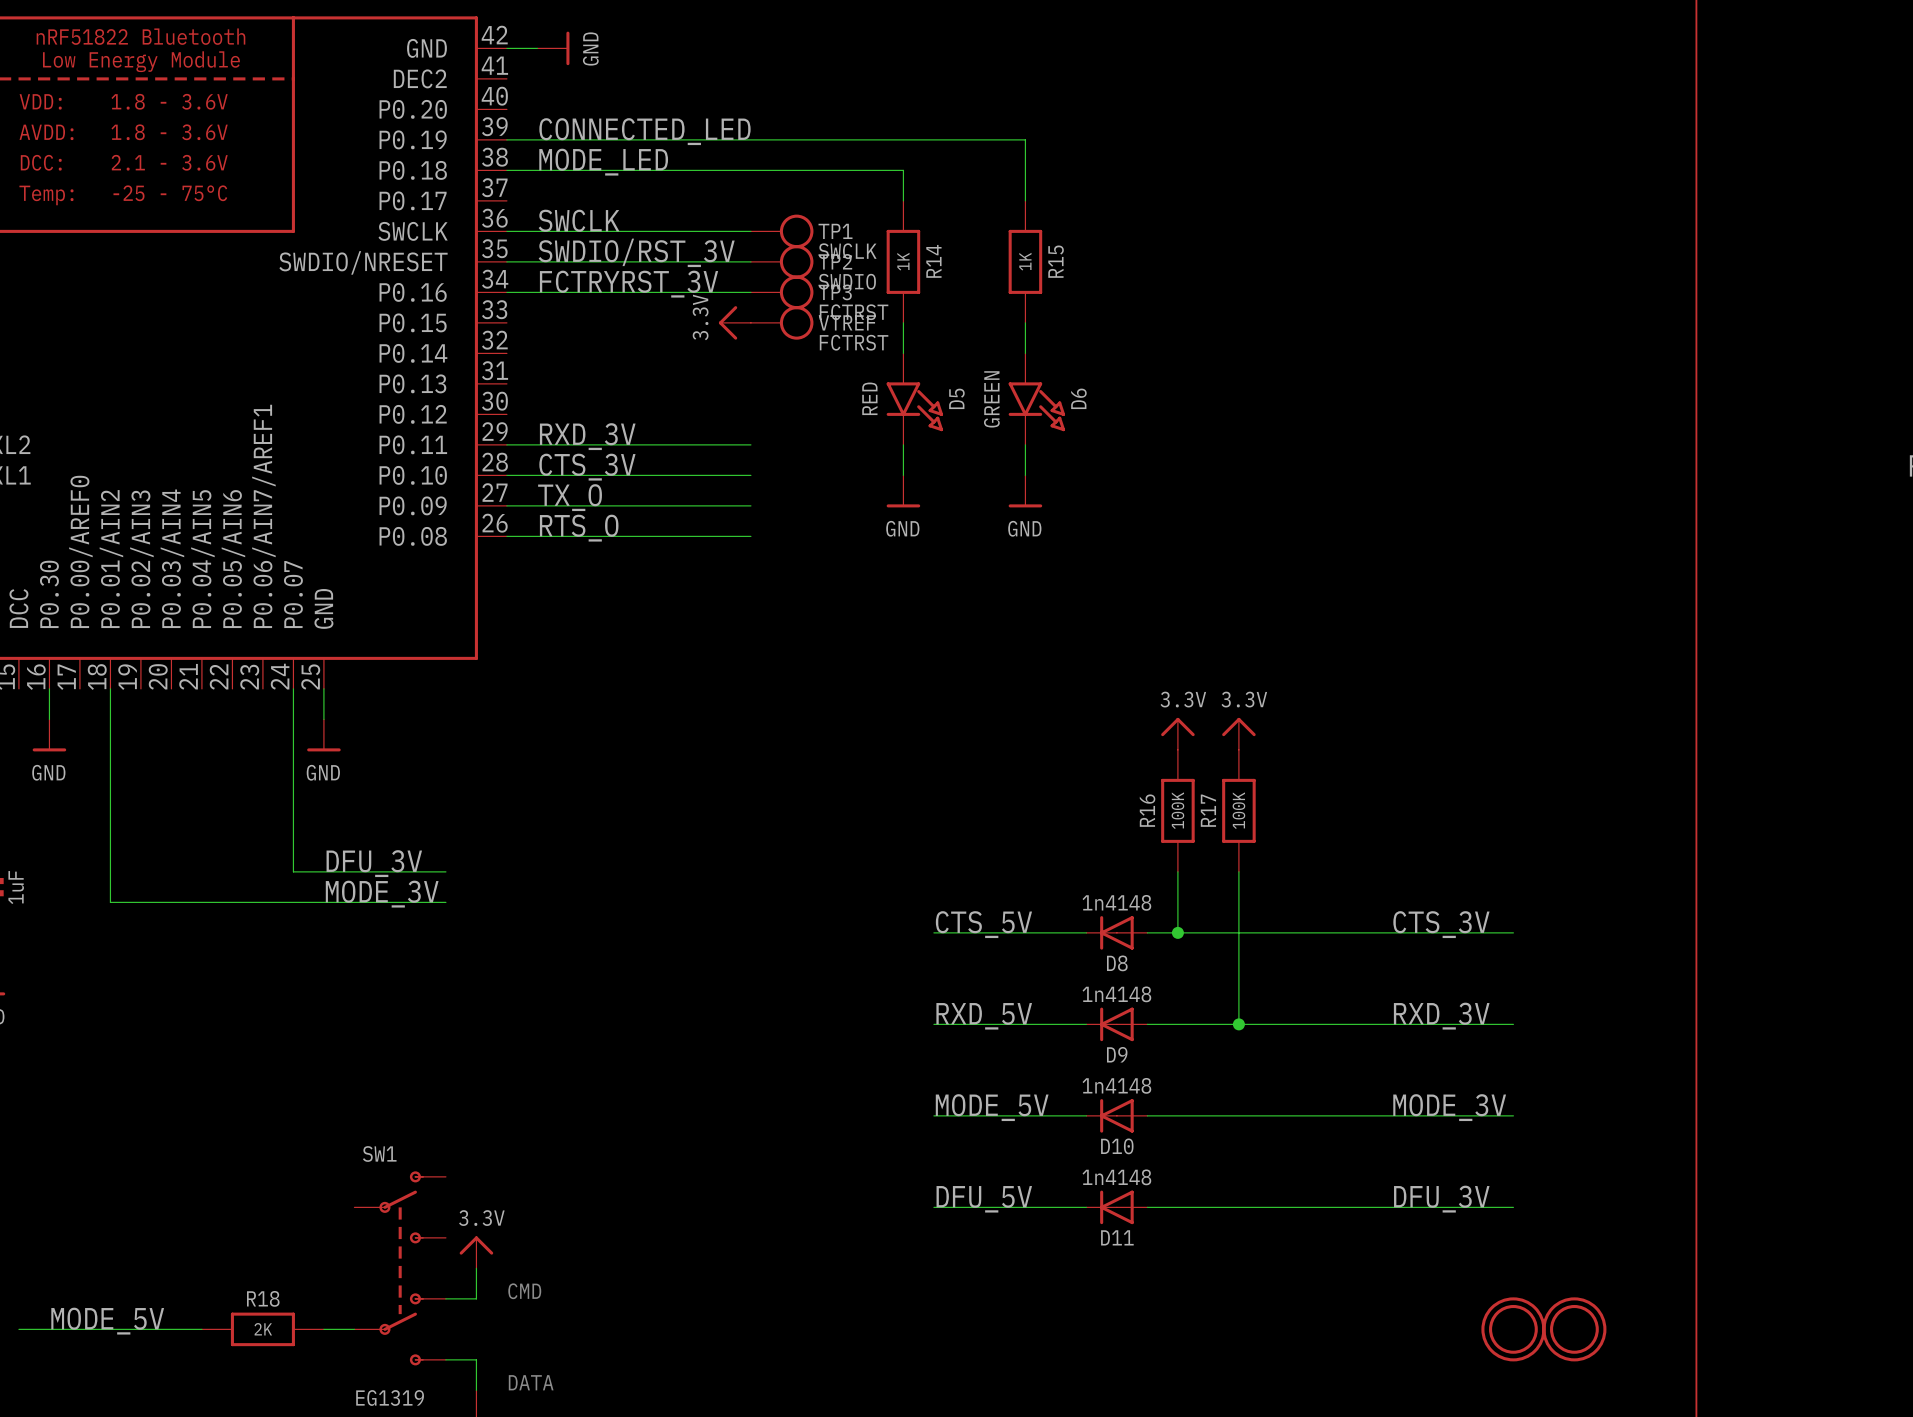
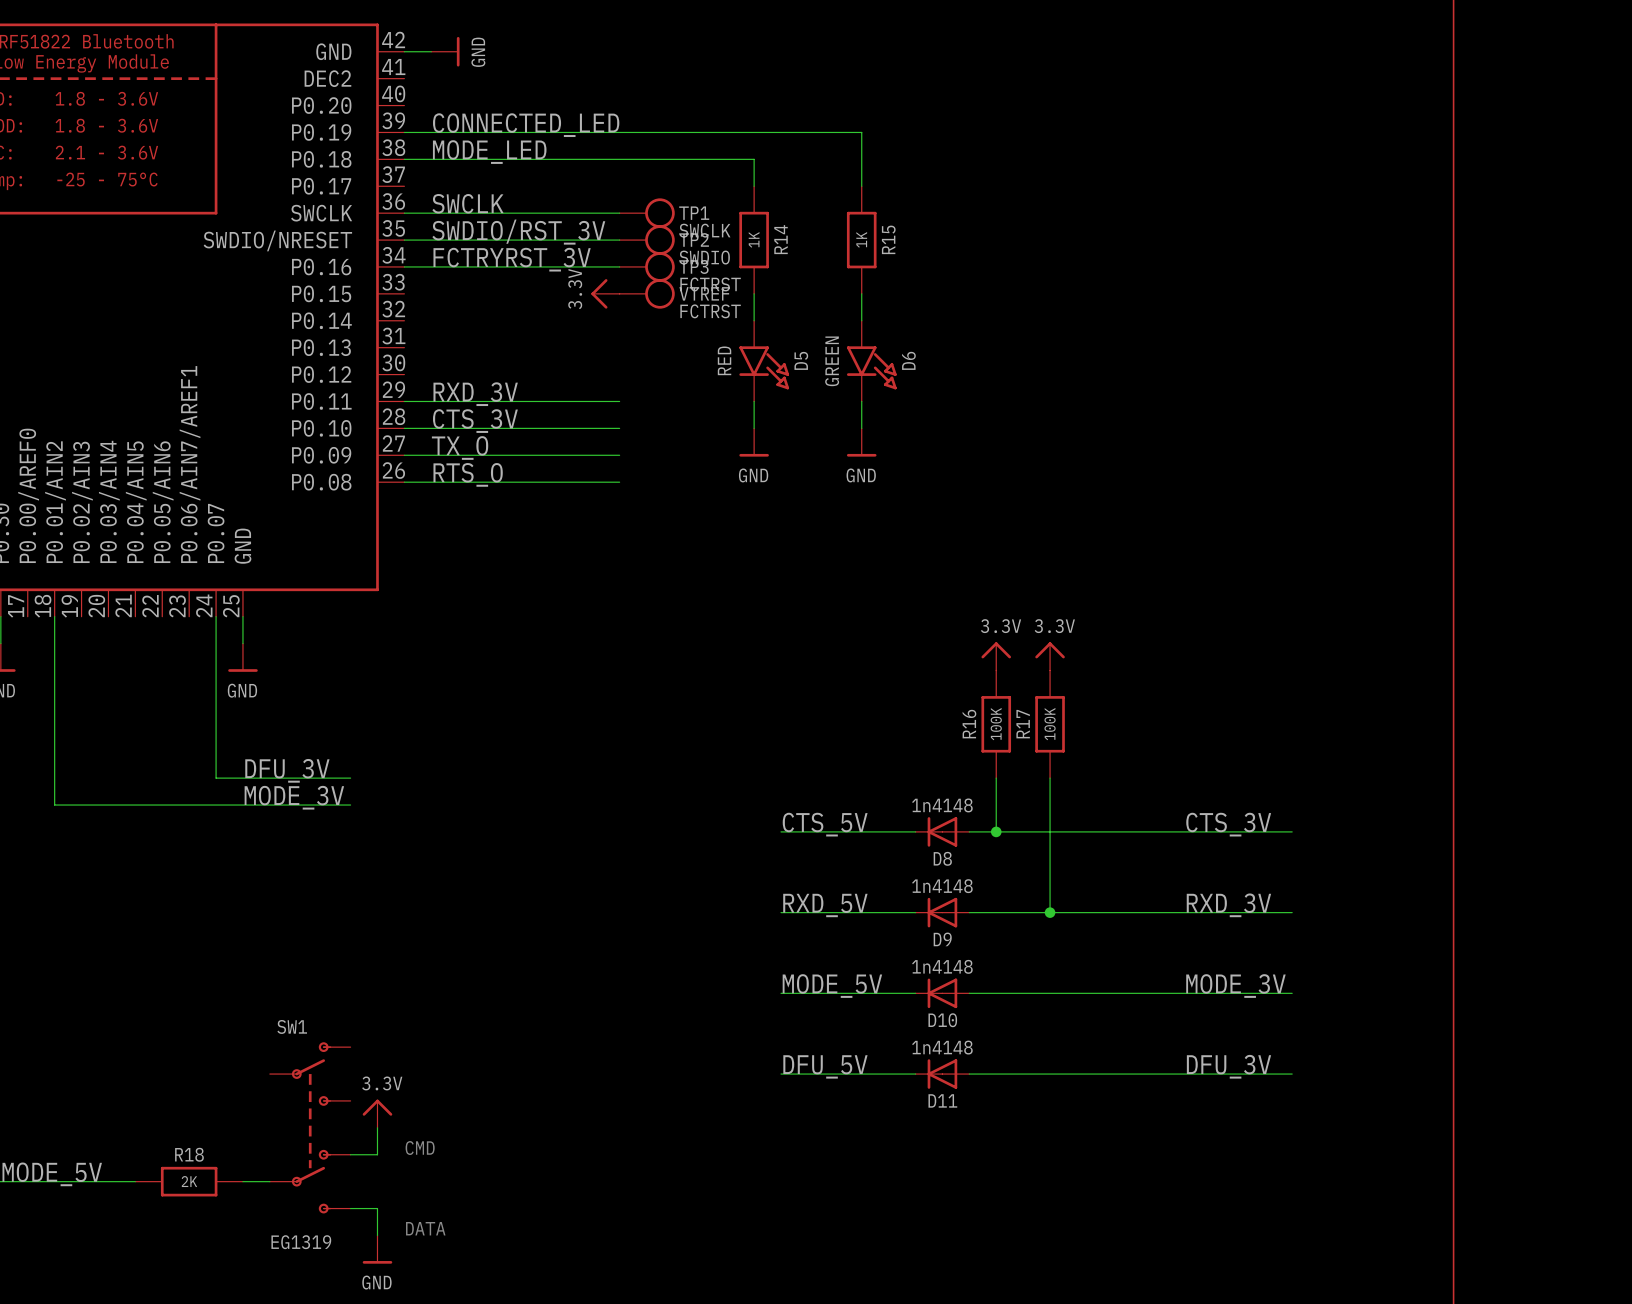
part: (1513, 1329) -> none
part: (1574, 1329) -> none

